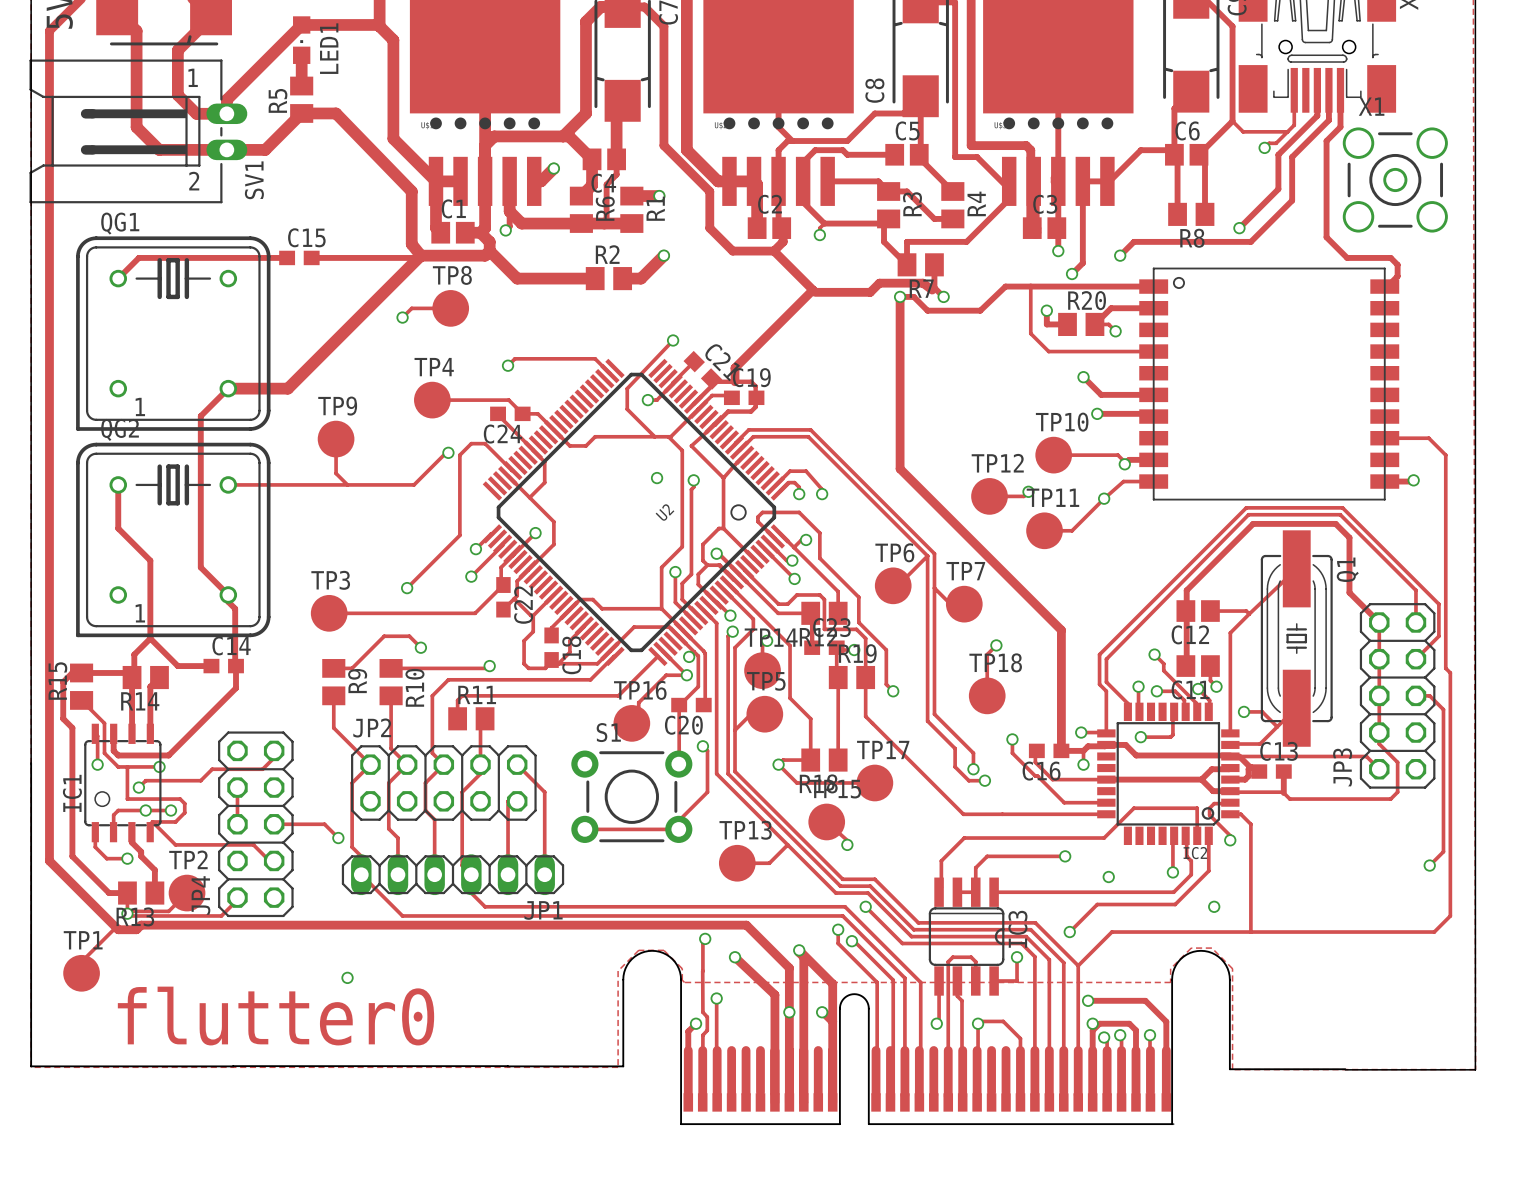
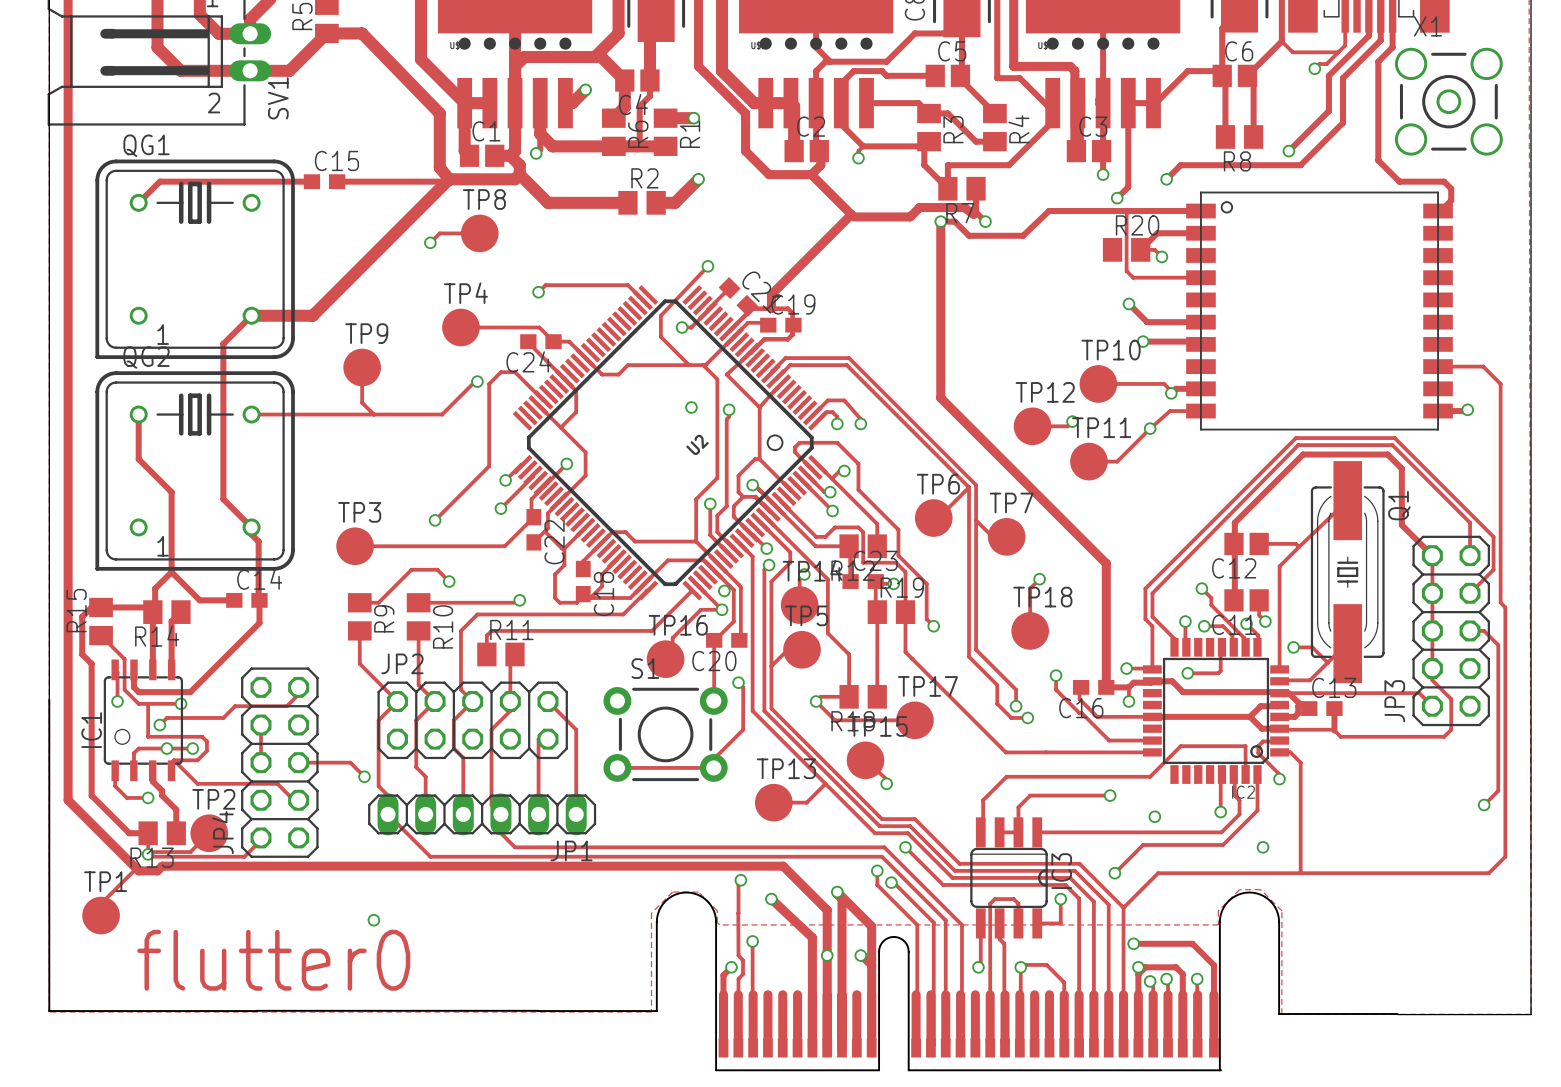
track: (1030, 286) (1030, 333) (1048, 351) (1087, 351) -> (1128, 211) (1126, 213) (1126, 271) (1133, 277)
track: (1046, 310) (1046, 324) (1067, 324) -> none
via: (1046, 310) -> none

